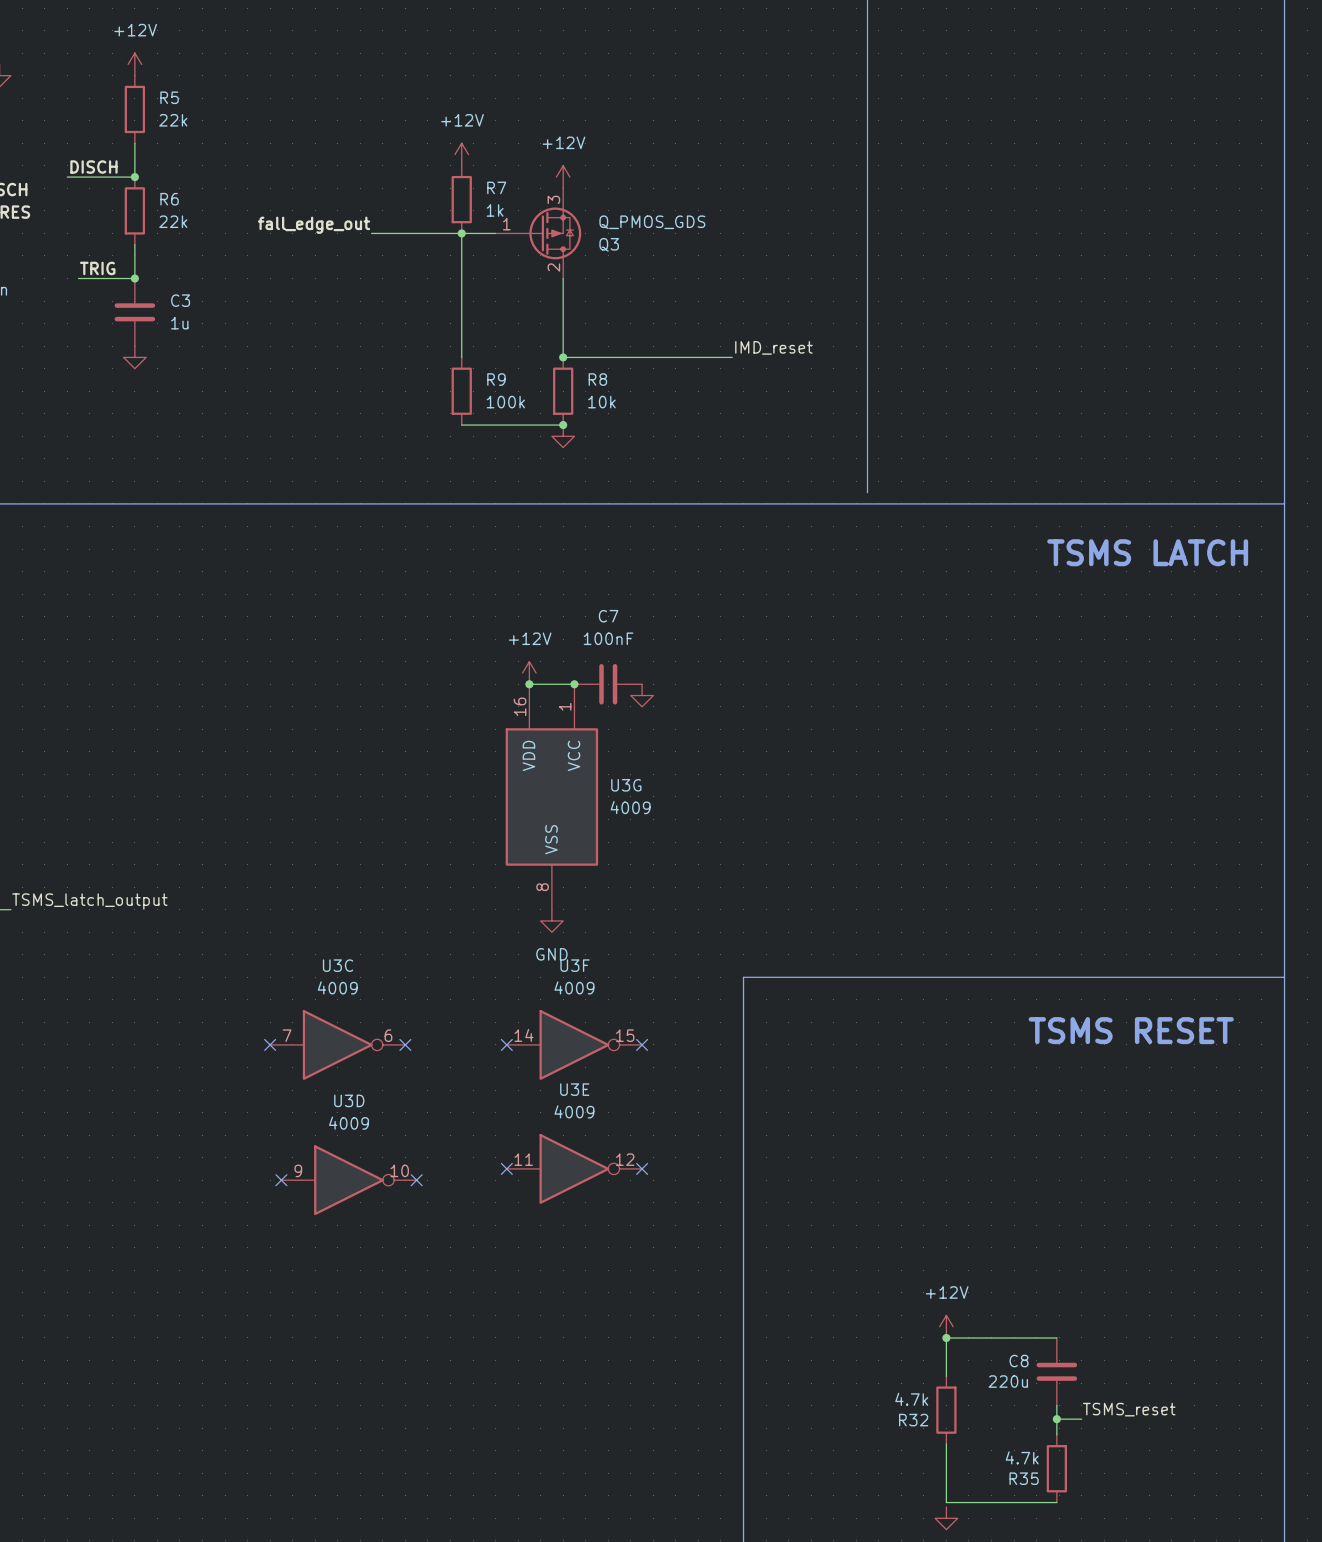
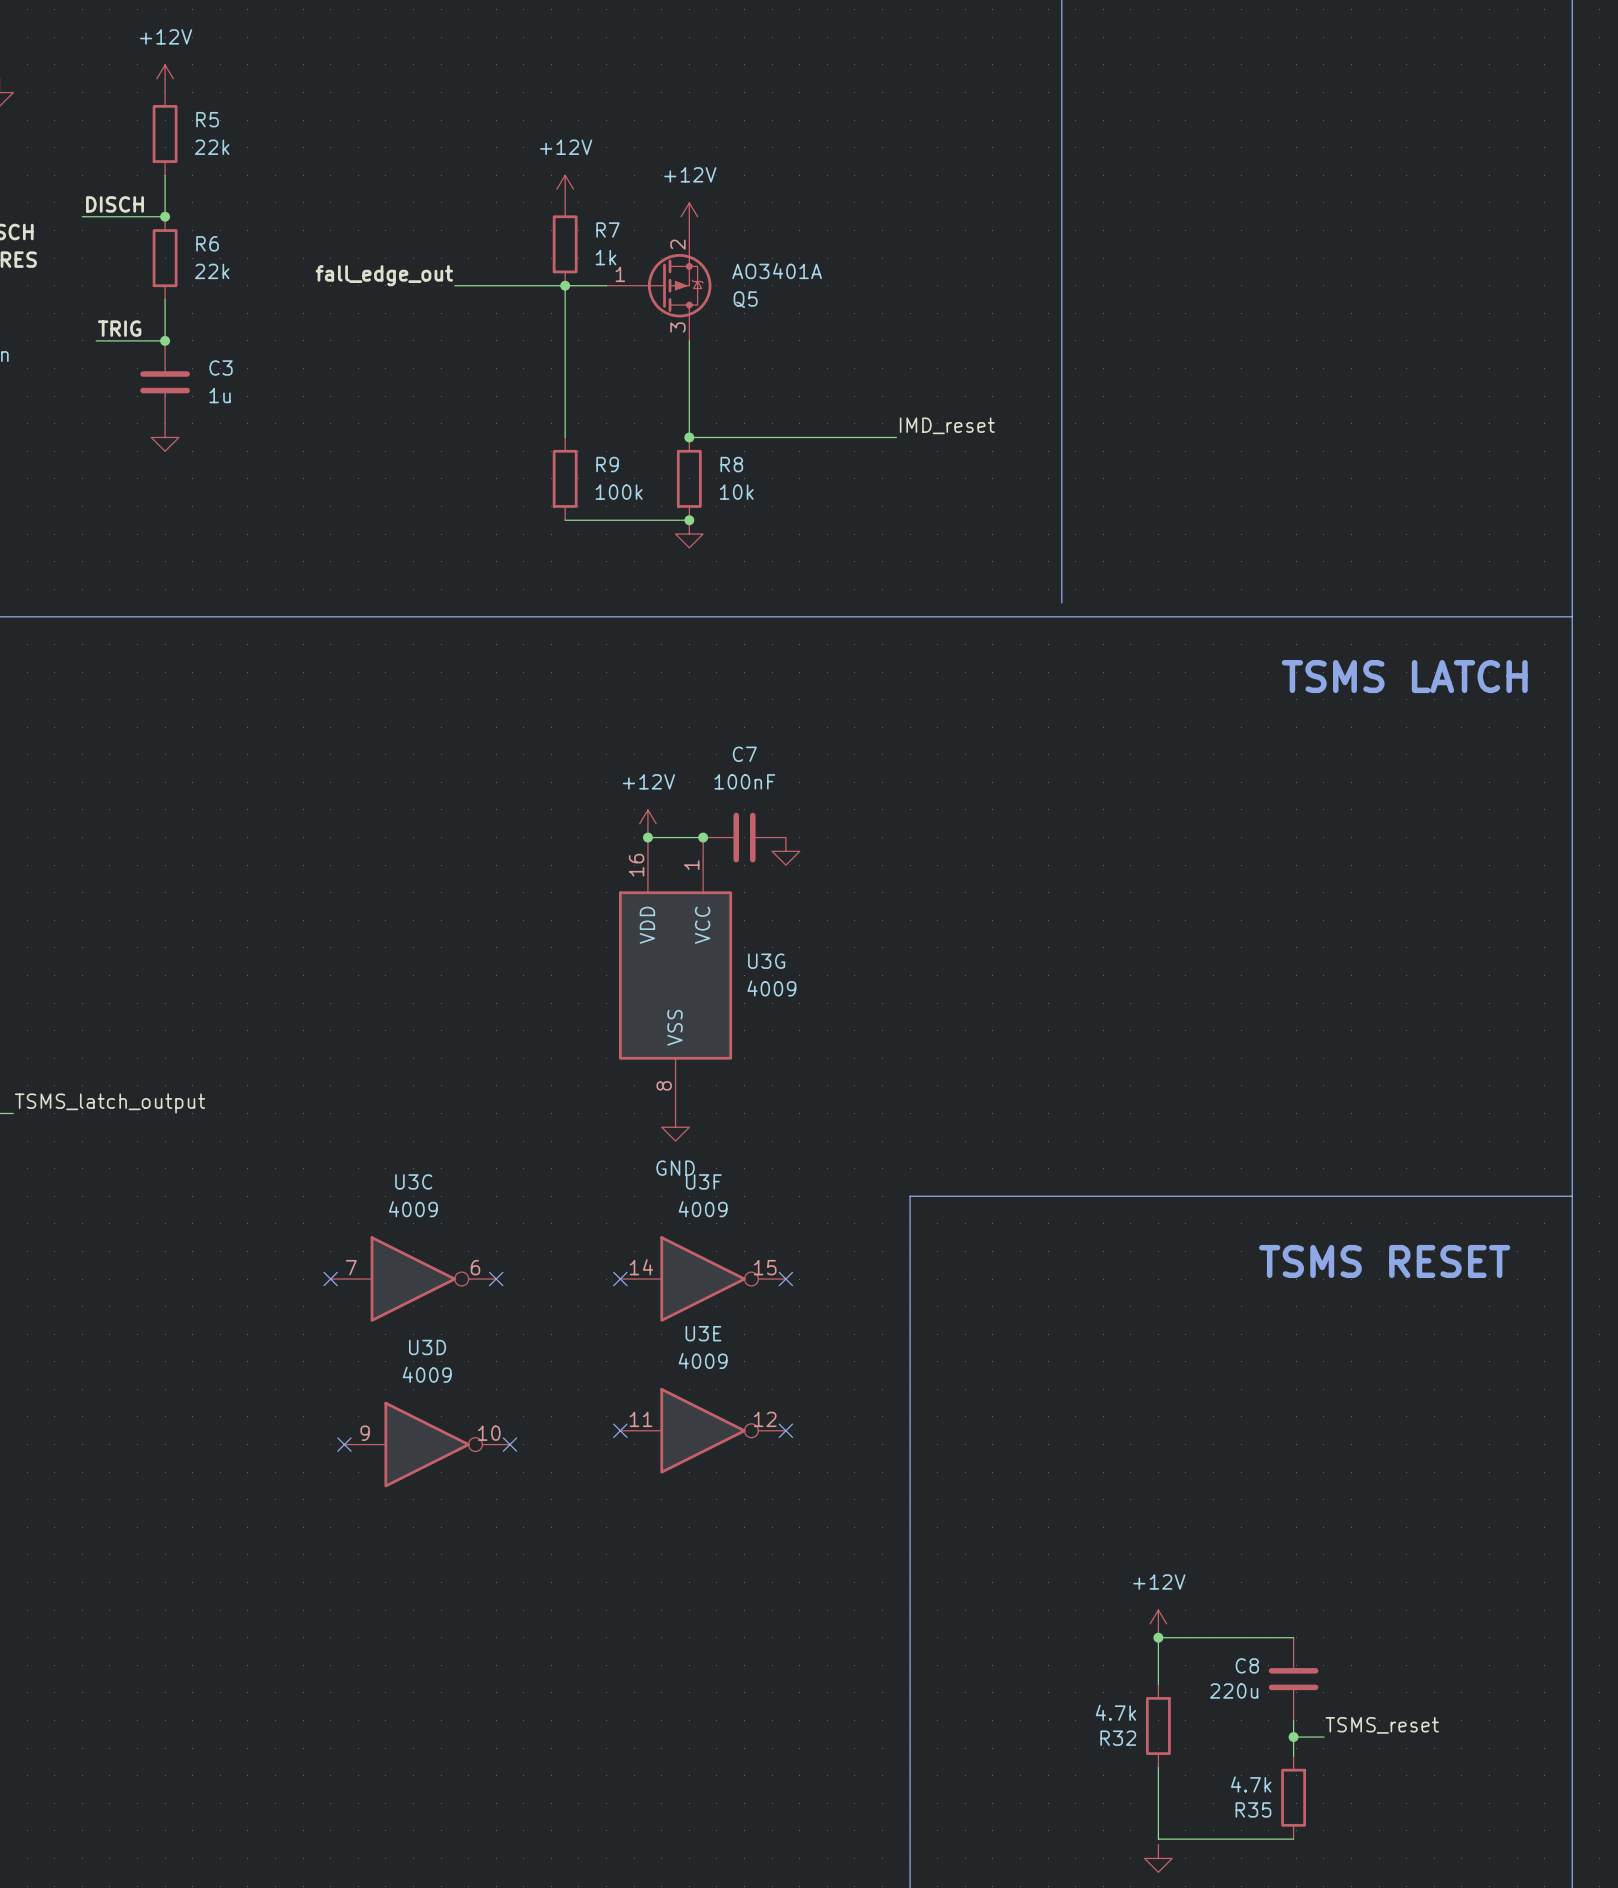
Q3: Q_PMOS_GDS (538, 233) -> none
Q5: none -> AO3401A (658, 285)

